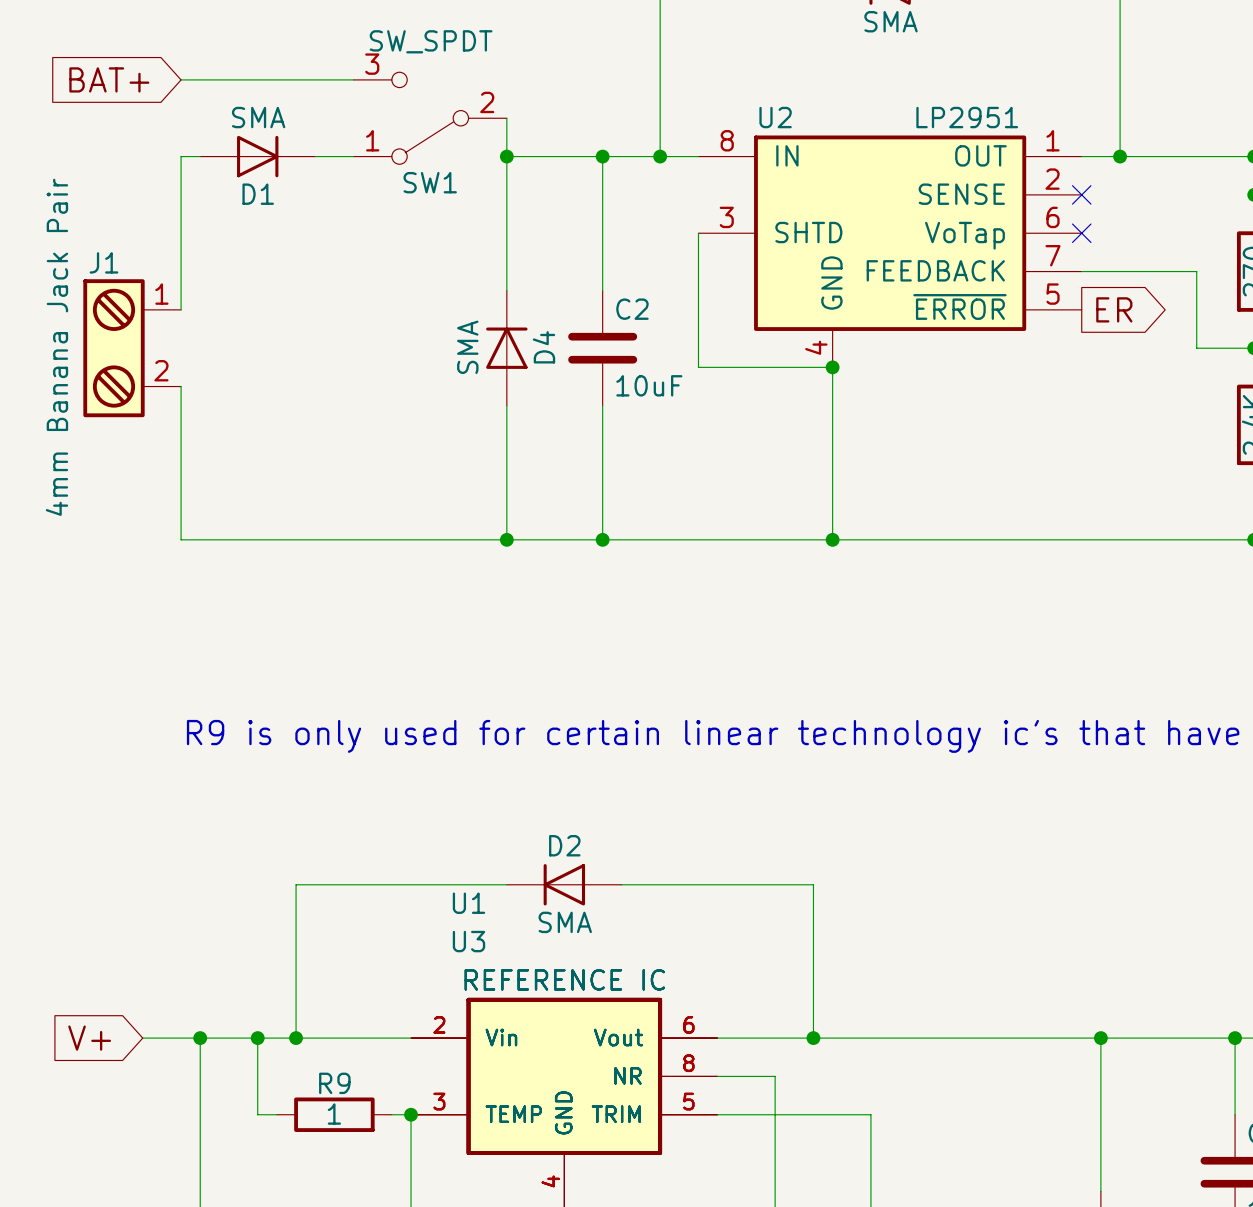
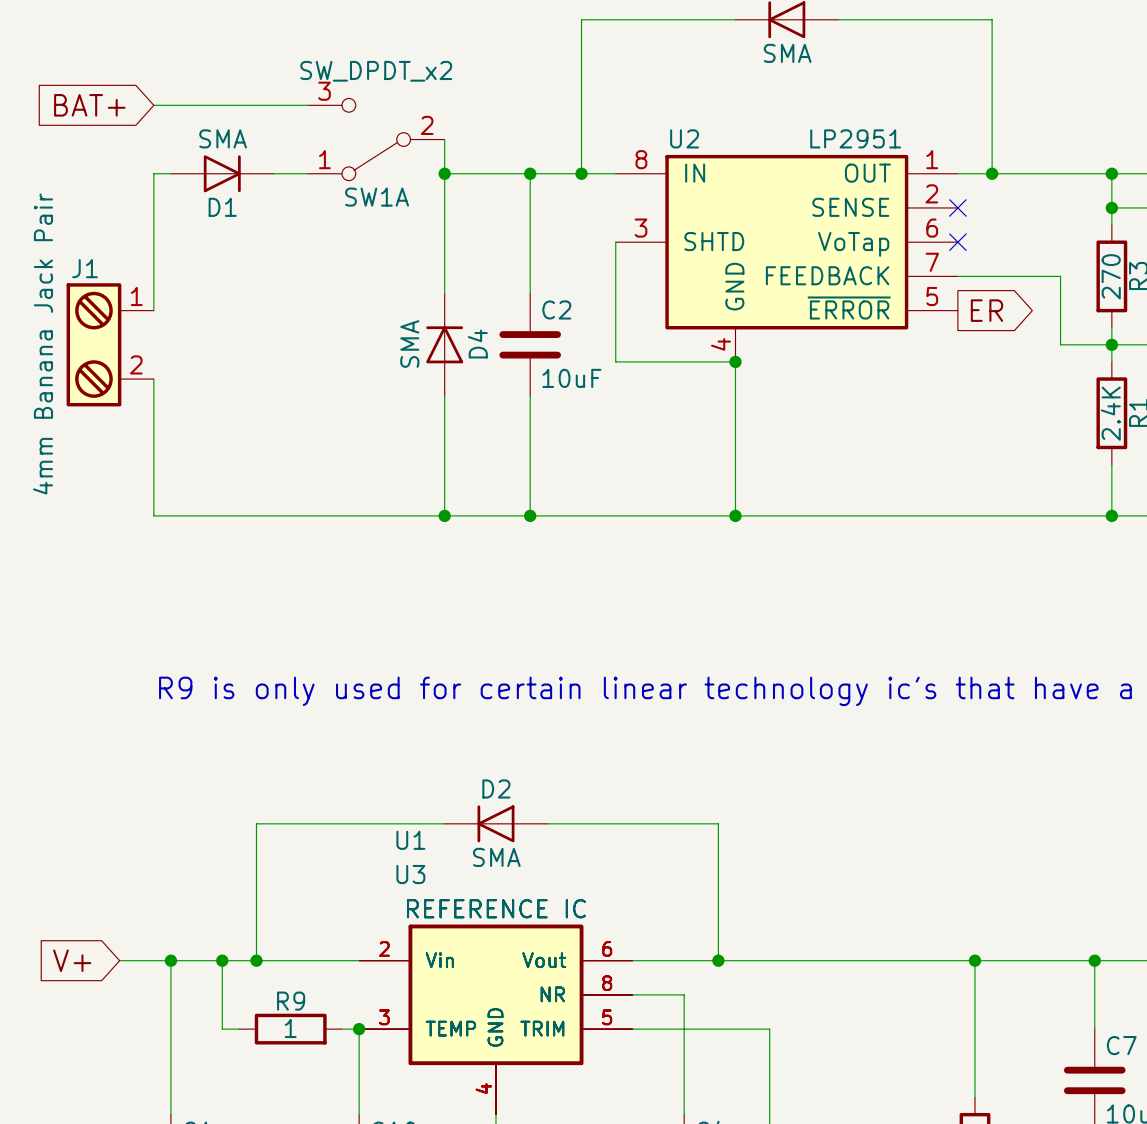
SW1 value: SW_SPDT (431, 41) -> SW_DPDT_x2 (376, 71)
SW1 name: SW1 (430, 182) -> SW1A (377, 197)

